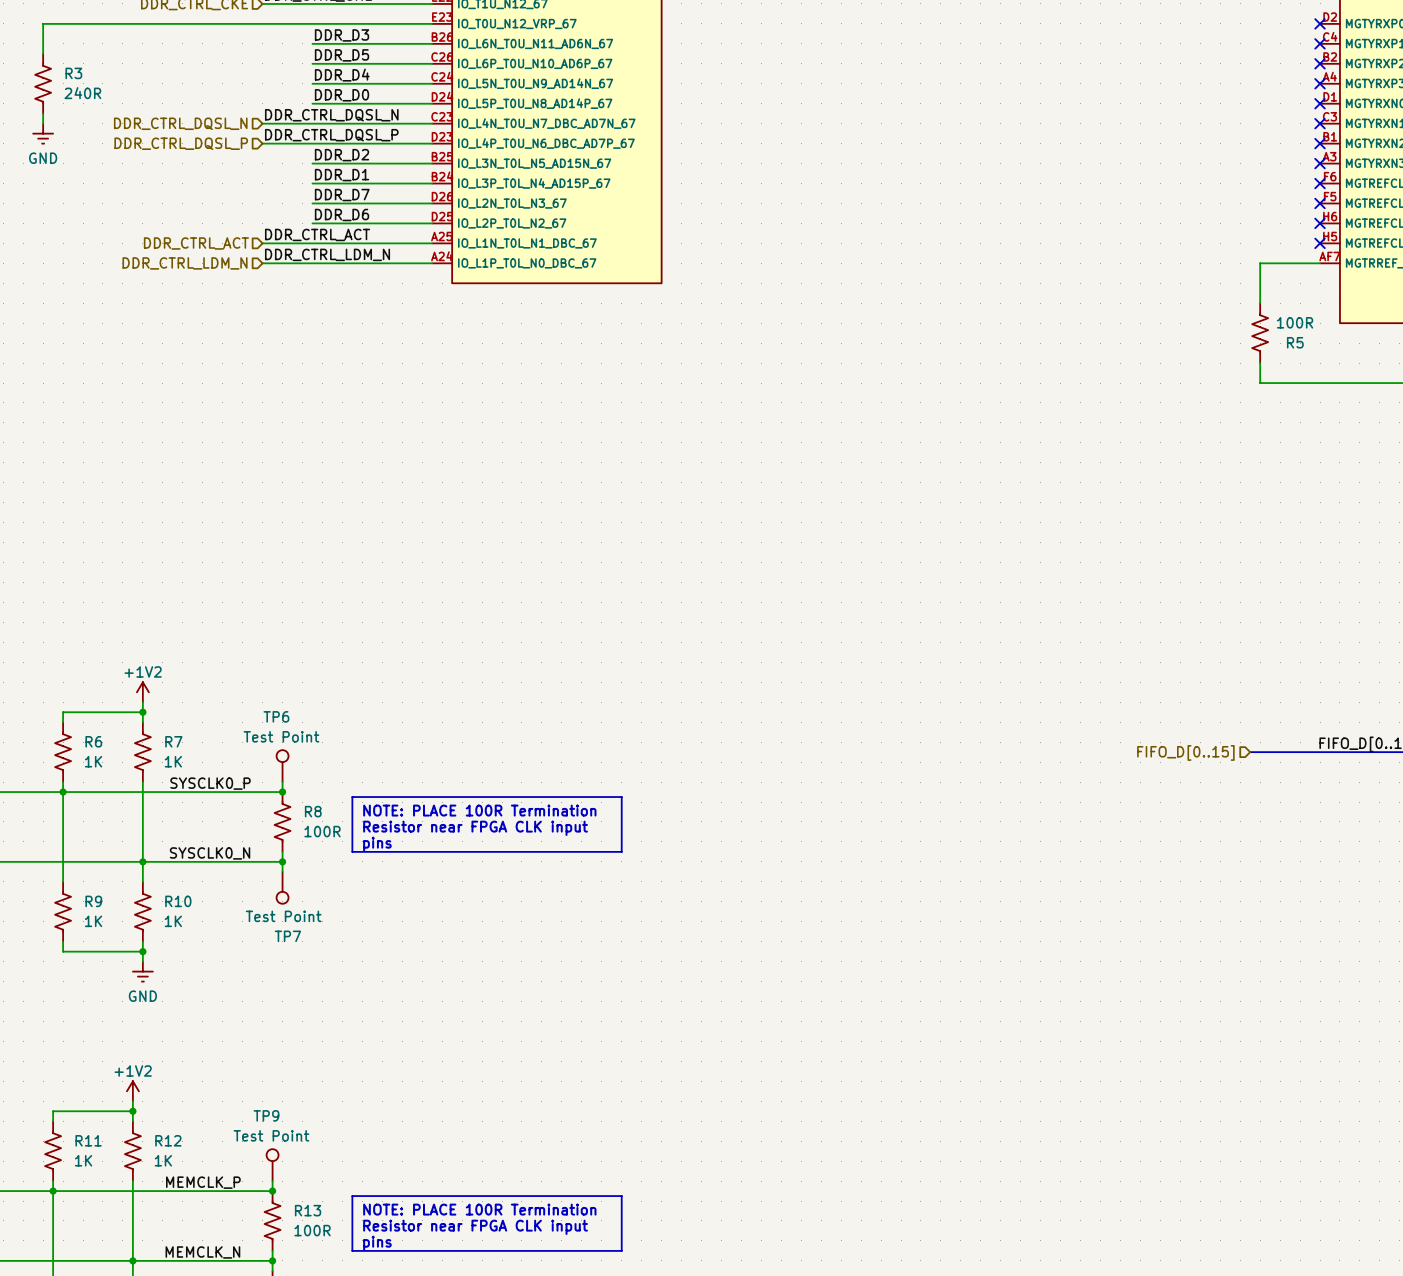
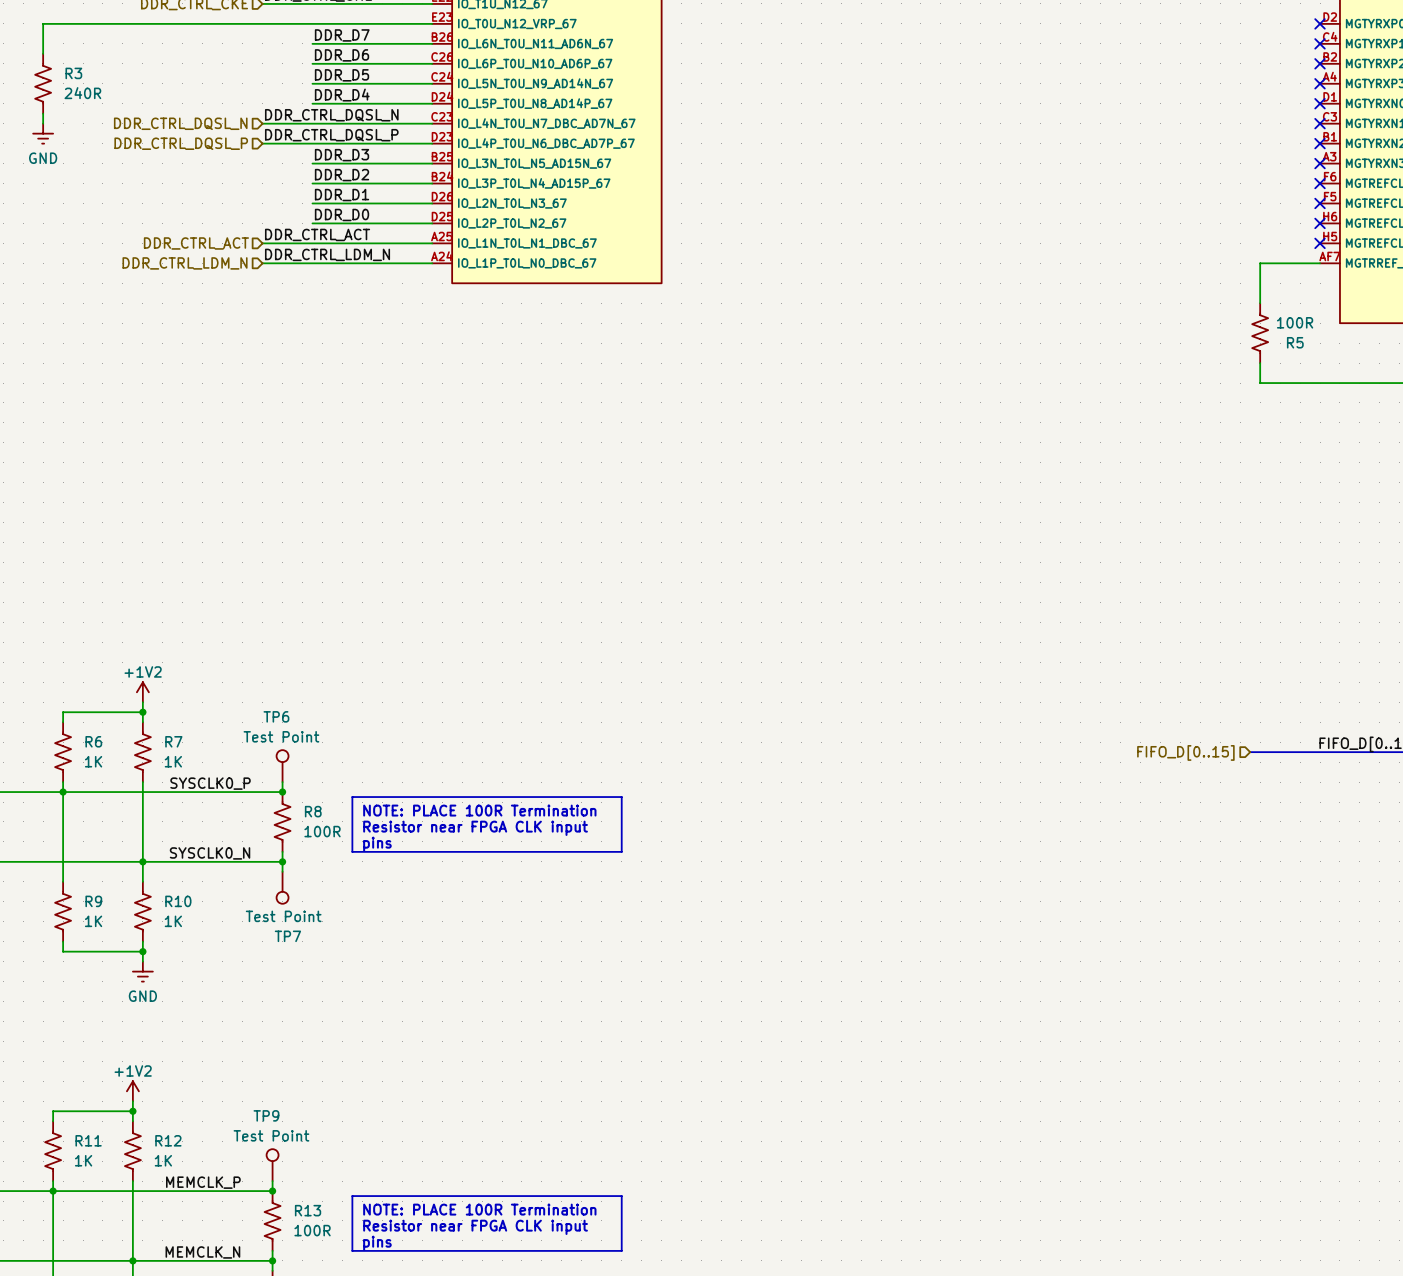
label: DDR_D3 (342, 35) -> DDR_D7 (342, 35)
label: DDR_D5 (342, 55) -> DDR_D6 (342, 55)
label: DDR_D4 (342, 75) -> DDR_D5 (342, 75)
label: DDR_D0 (342, 95) -> DDR_D4 (342, 95)
label: DDR_D2 (342, 155) -> DDR_D3 (342, 155)
label: DDR_D1 (342, 175) -> DDR_D2 (342, 175)
label: DDR_D7 (342, 195) -> DDR_D1 (342, 195)
label: DDR_D6 (342, 215) -> DDR_D0 (342, 215)

